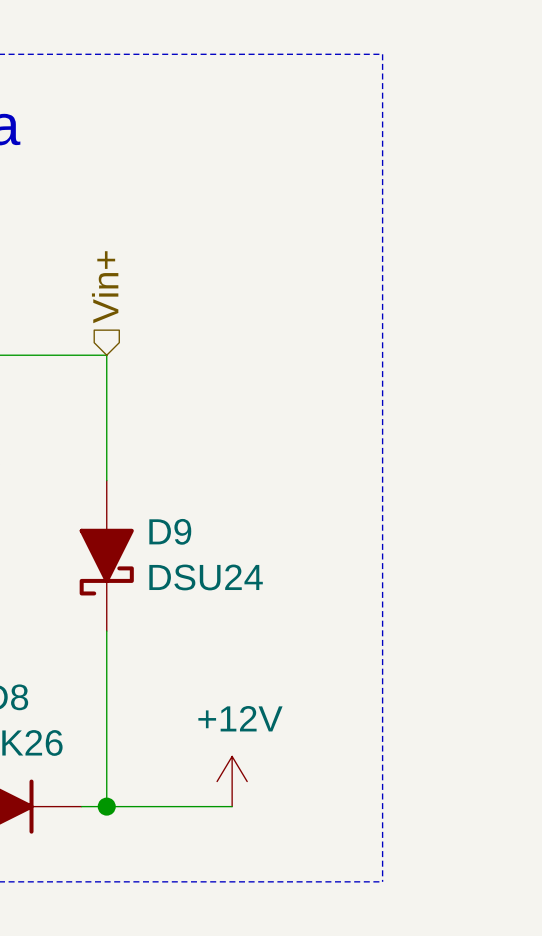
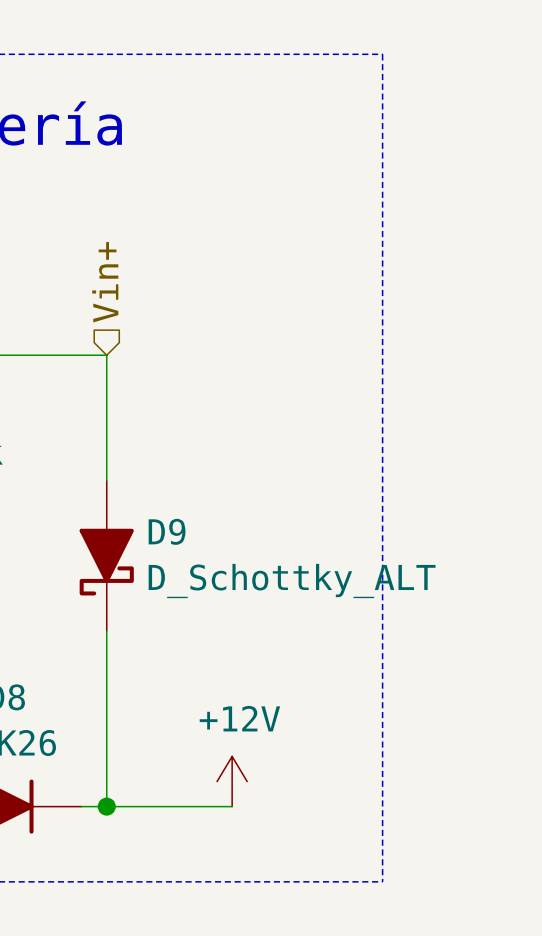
D9 value: DSU24 (206, 577) -> D_Schottky_ALT (292, 581)

